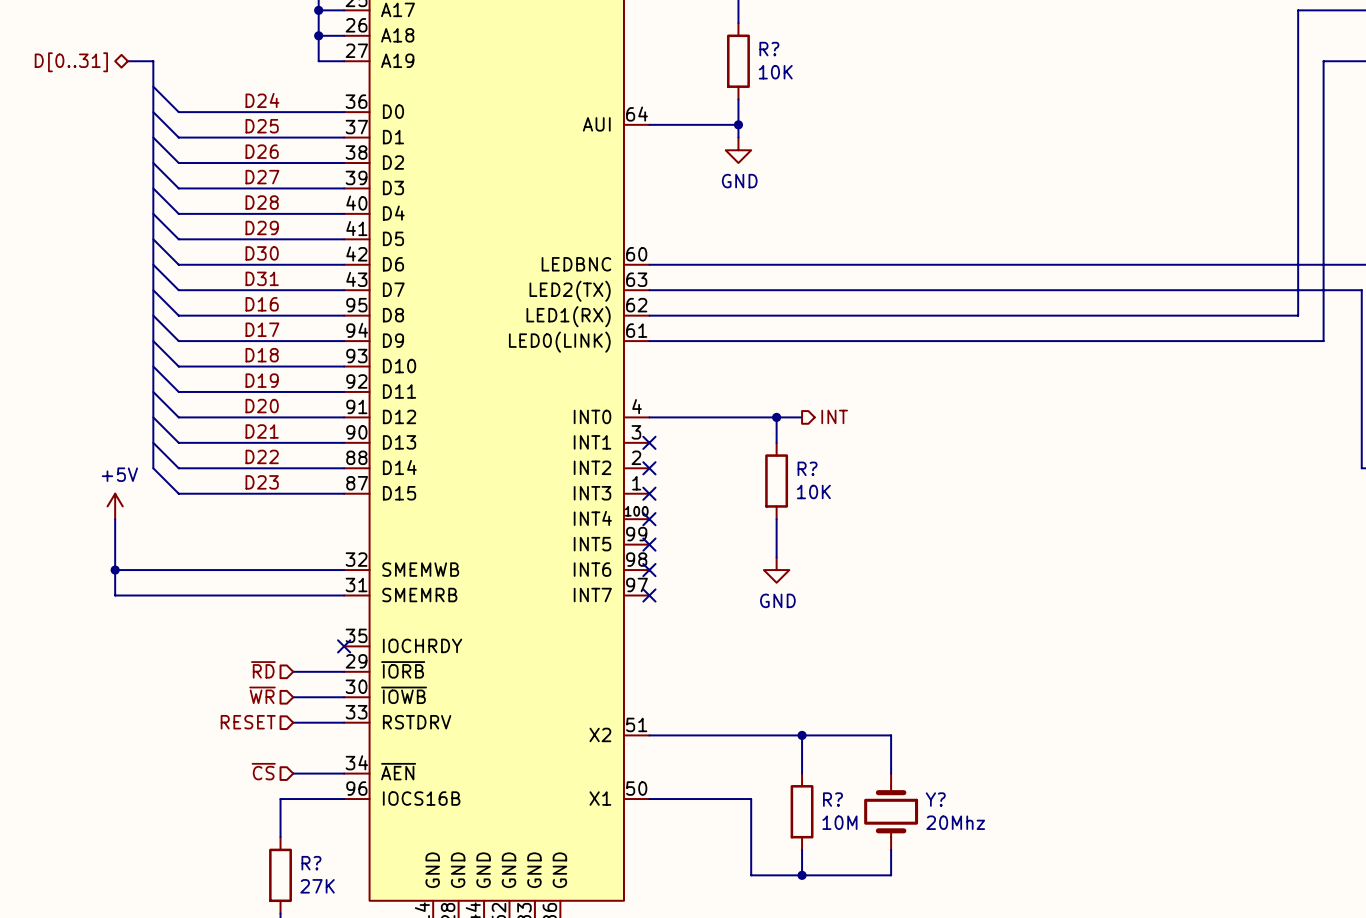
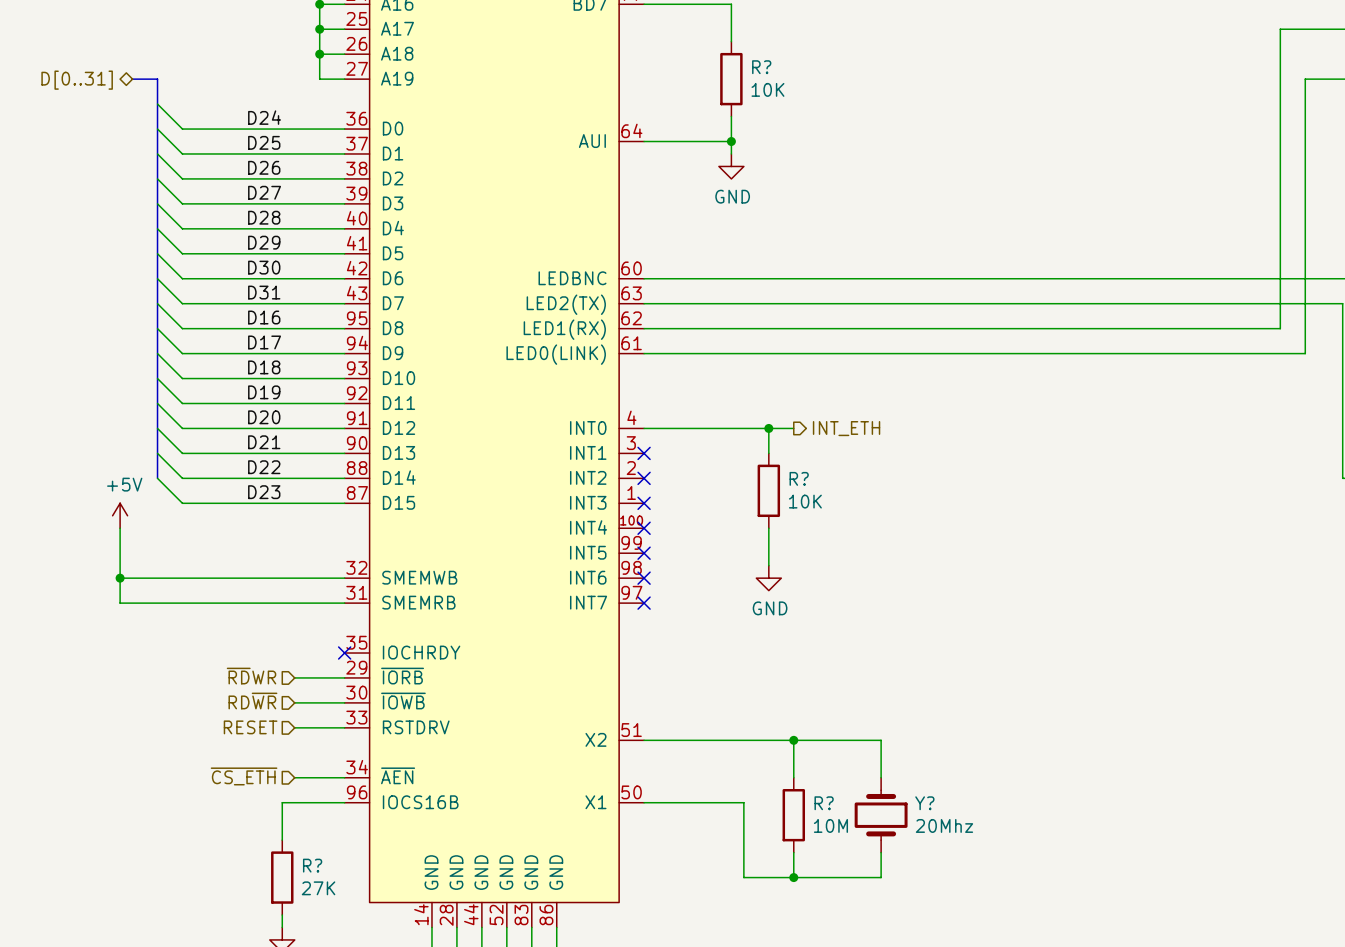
hierarchical label: INT (834, 416) -> INT_ETH (846, 428)
hierarchical label: ~{RD} (263, 669) -> ~{RD}WR (251, 676)
hierarchical label: ~{WR} (262, 695) -> RD~{WR} (252, 701)
hierarchical label: ~{CS} (263, 771) -> ~{CS_ETH} (244, 776)

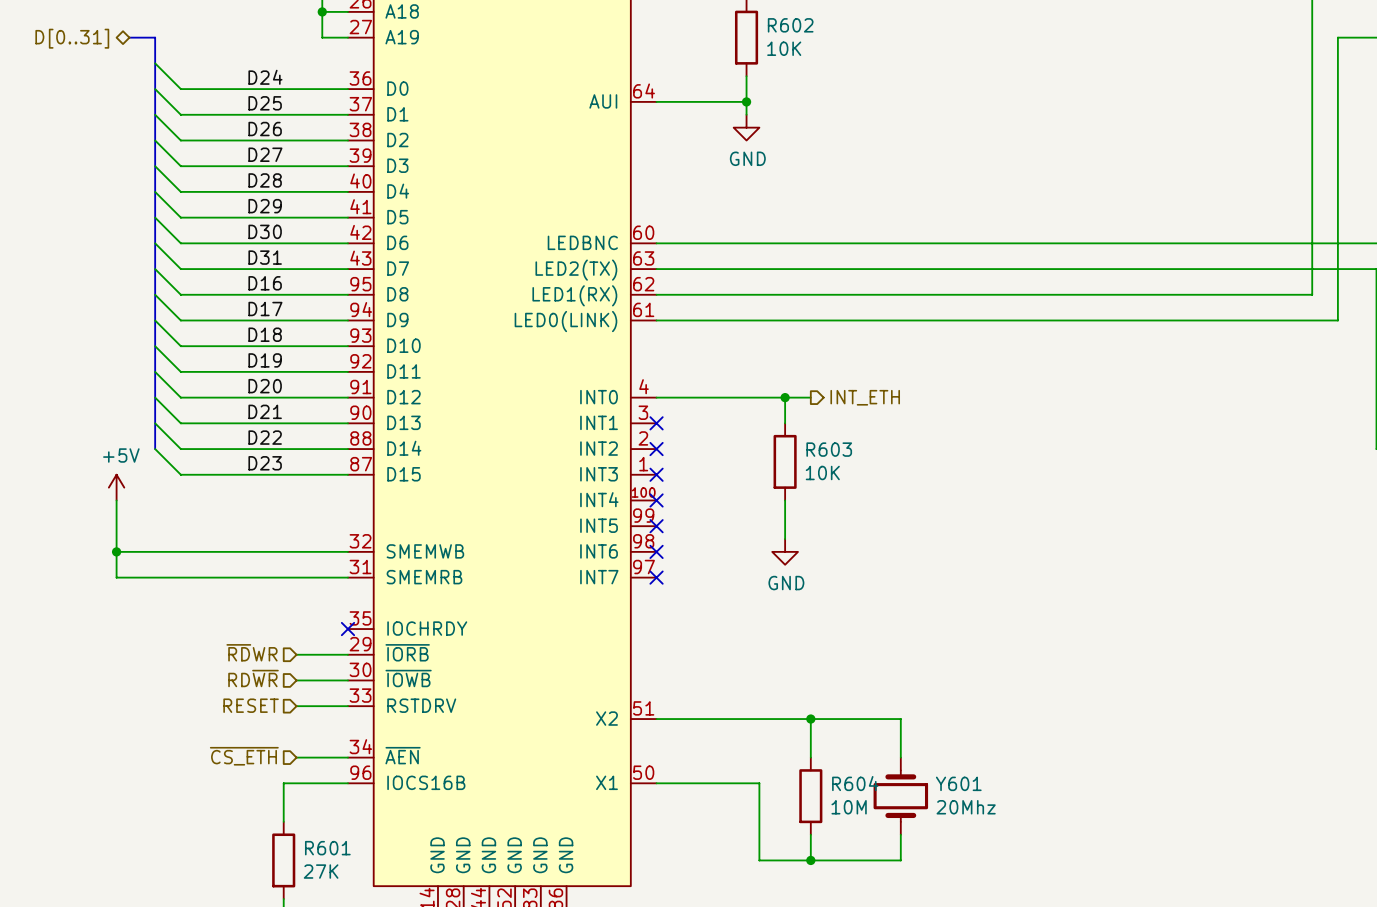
R? name: R? (761, 67) -> R602 (790, 25)
R? name: R? (799, 478) -> R603 (829, 449)
R? name: R? (824, 803) -> R604 (855, 783)
Y? name: Y? (924, 803) -> Y601 (958, 783)
R? name: R? (312, 865) -> R601 (327, 848)

